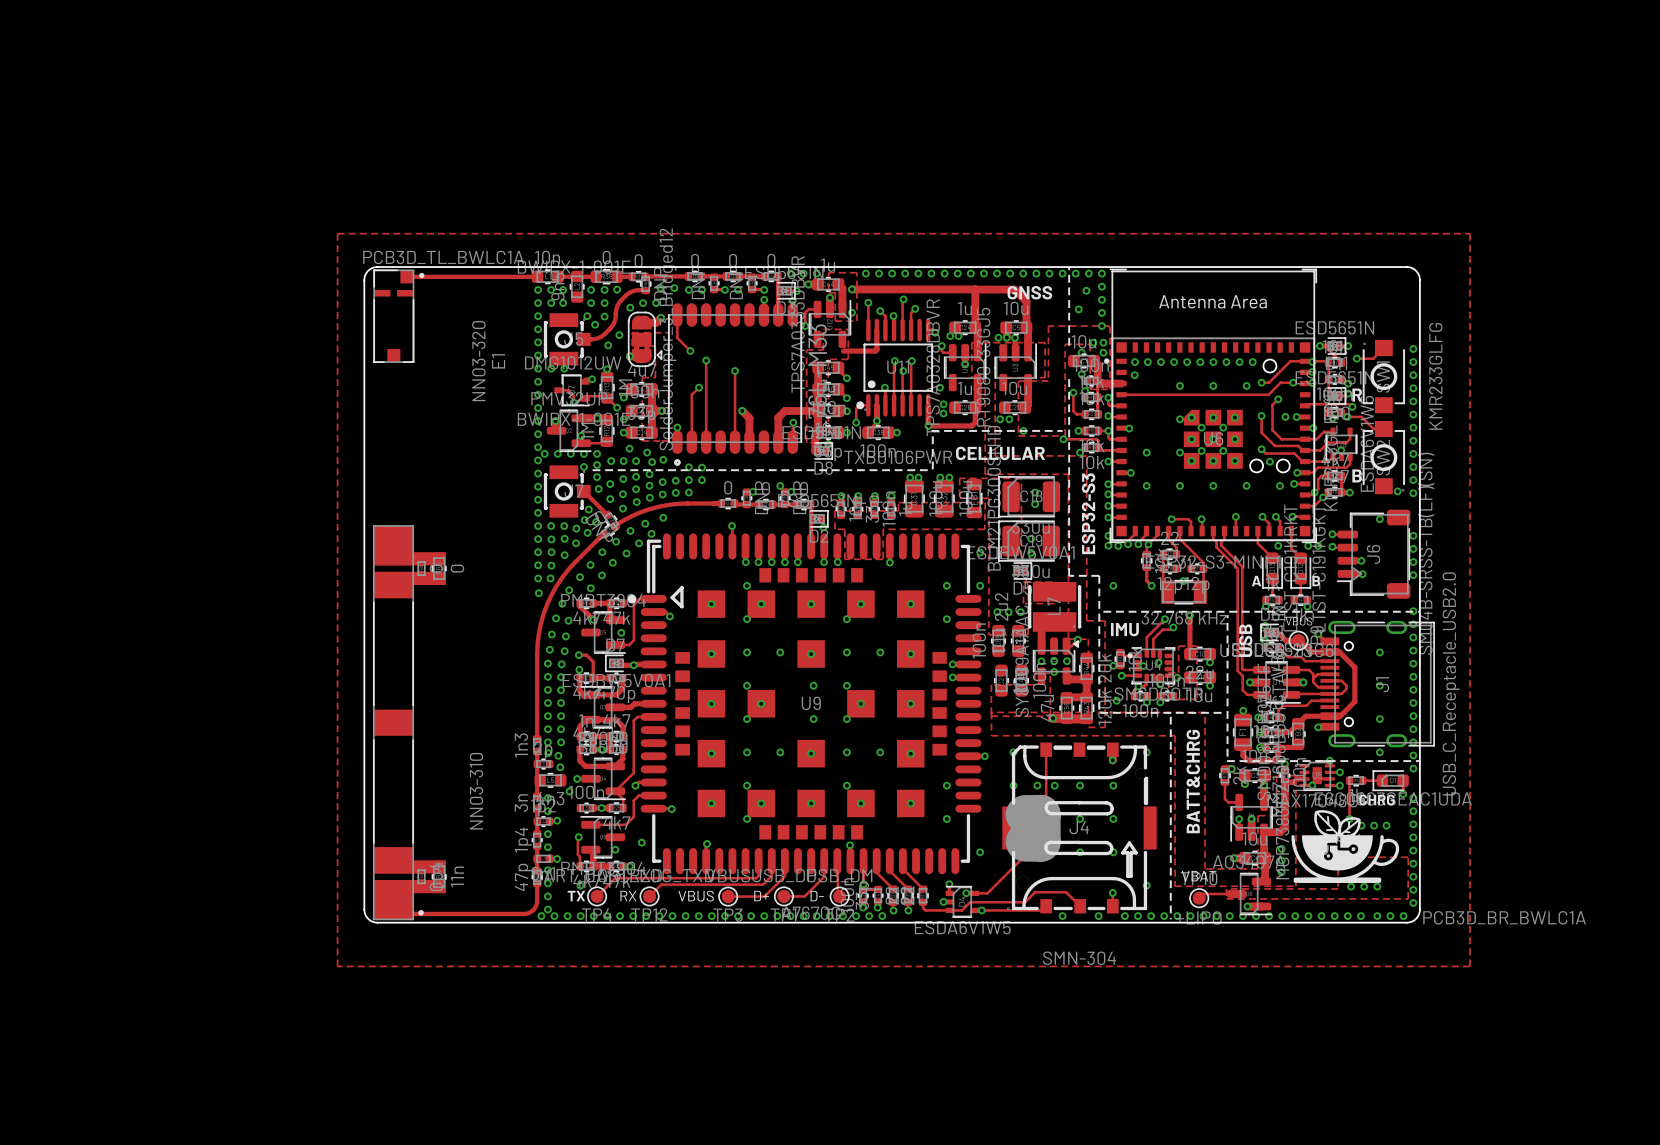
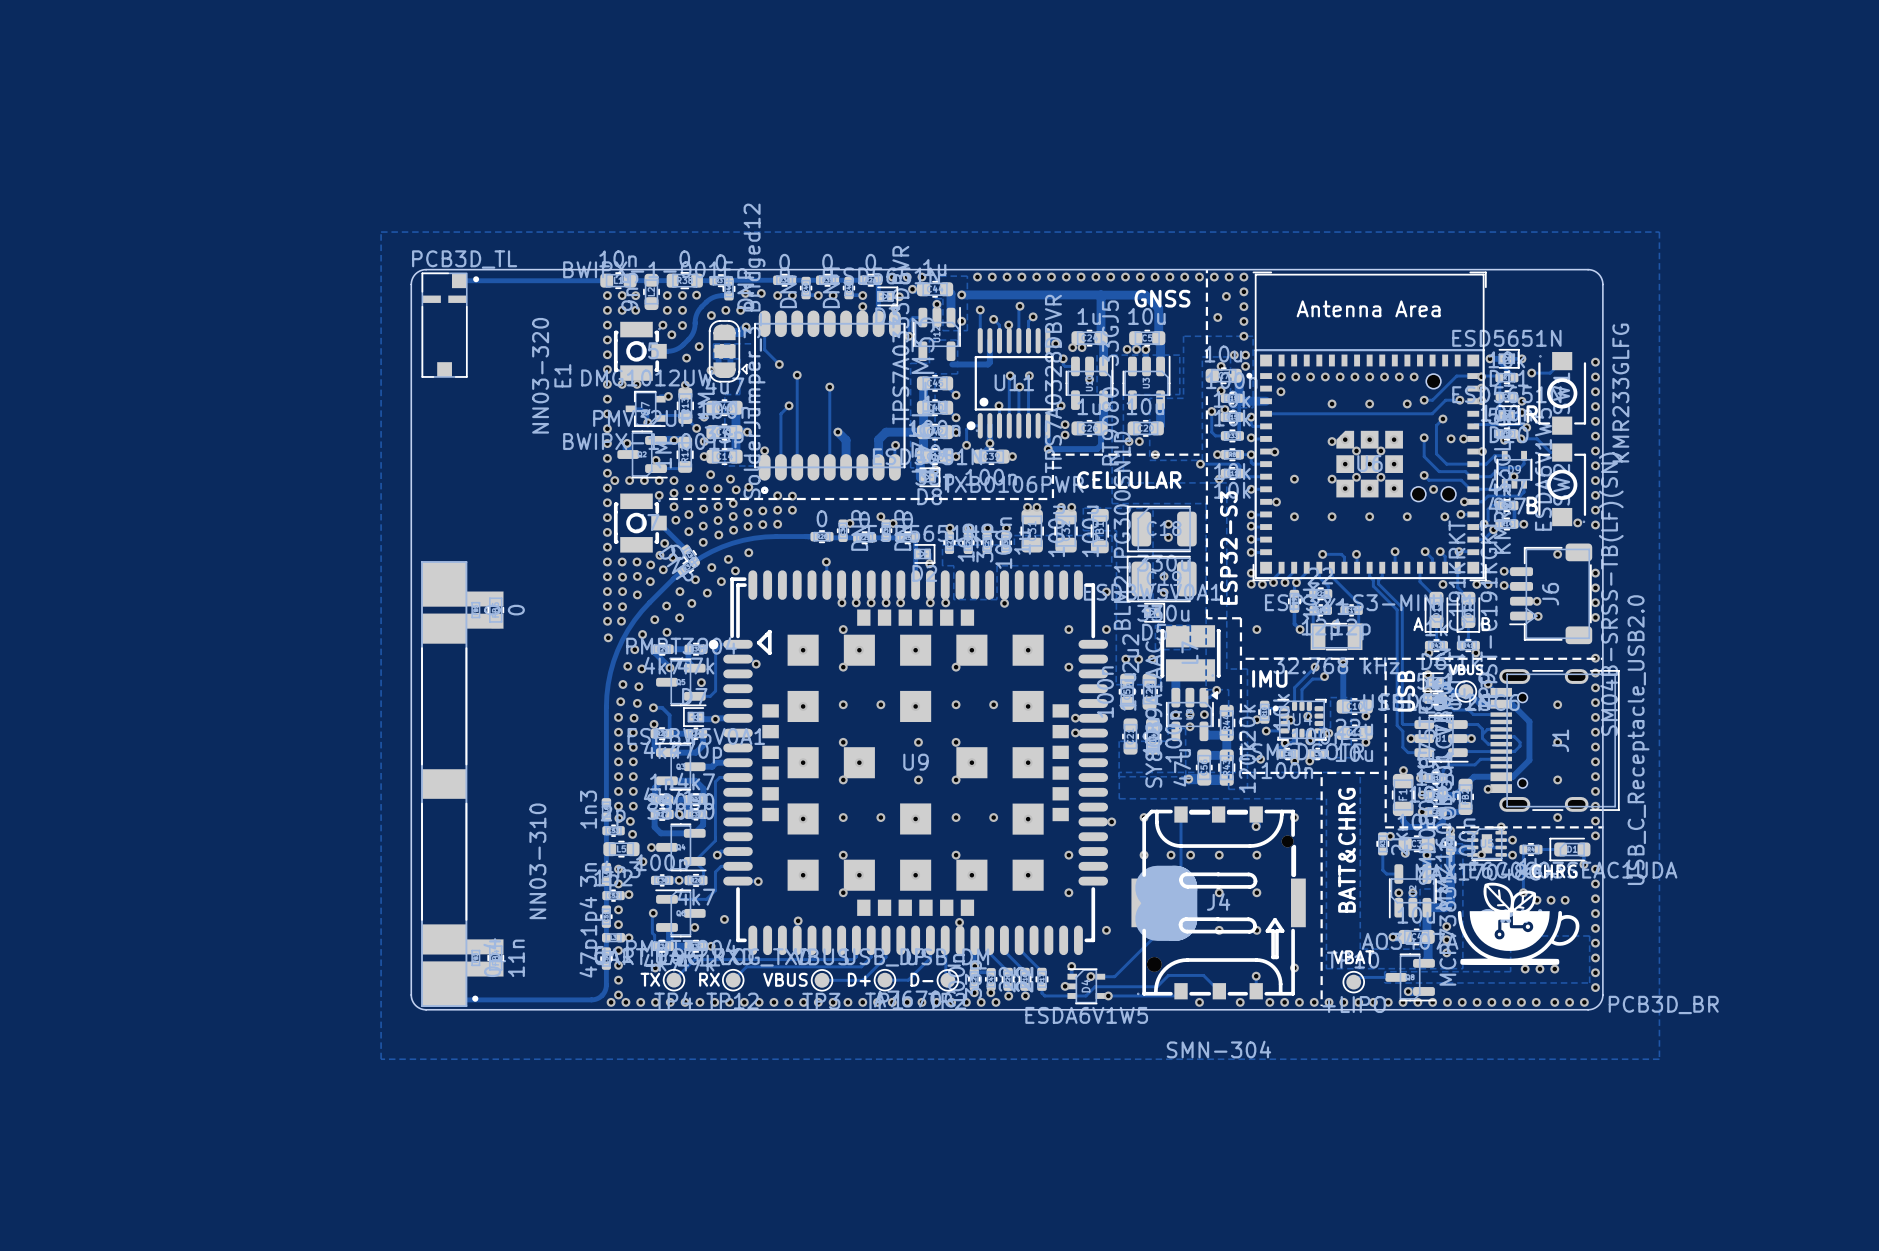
text: PCB3D_TL_BWLC1A (443, 257) -> PCB3D_TL (464, 259)
text: PCB3D_BR_BWLC1A (1504, 917) -> PCB3D_BR (1663, 1004)

